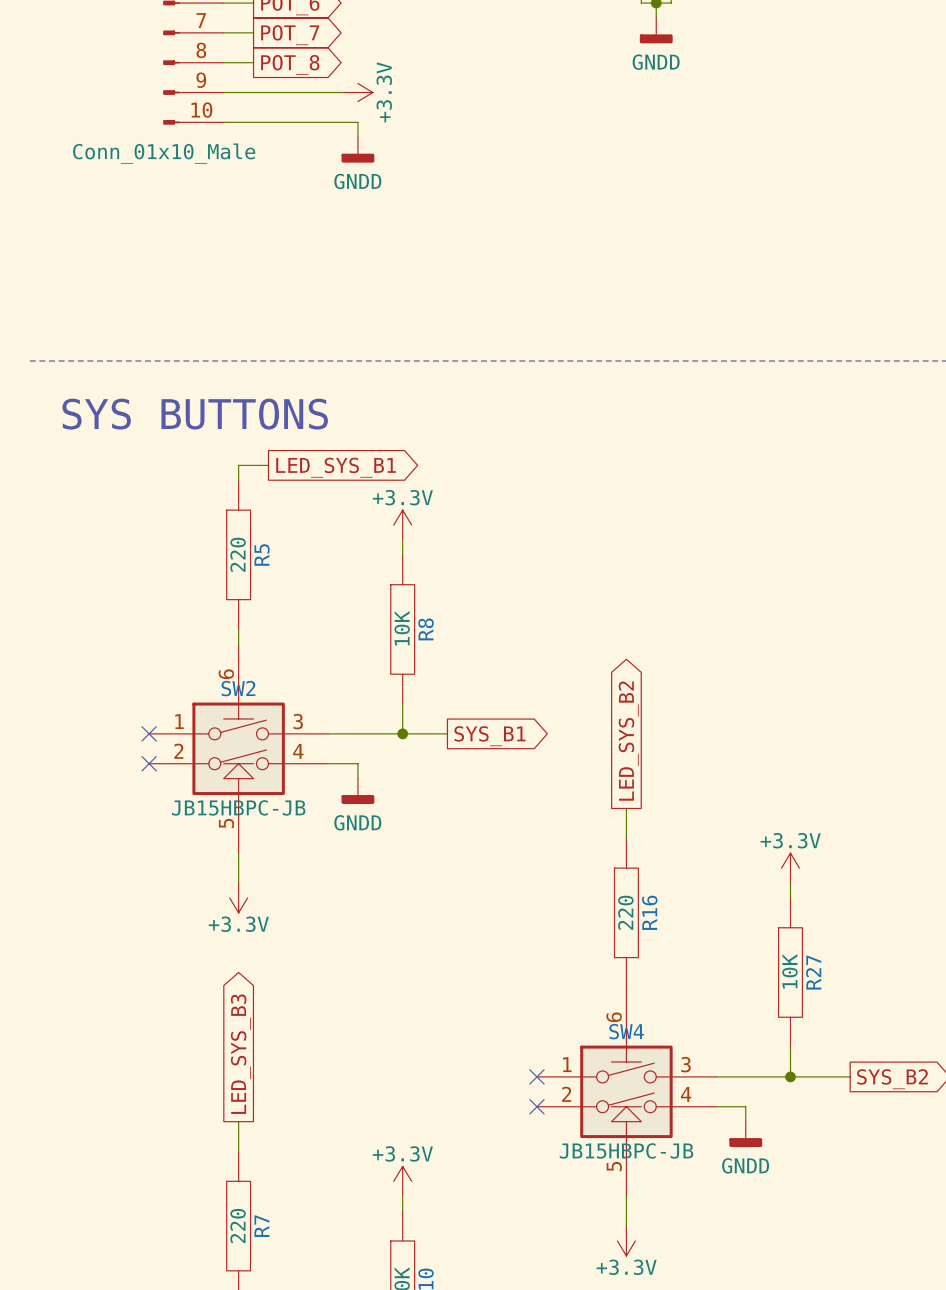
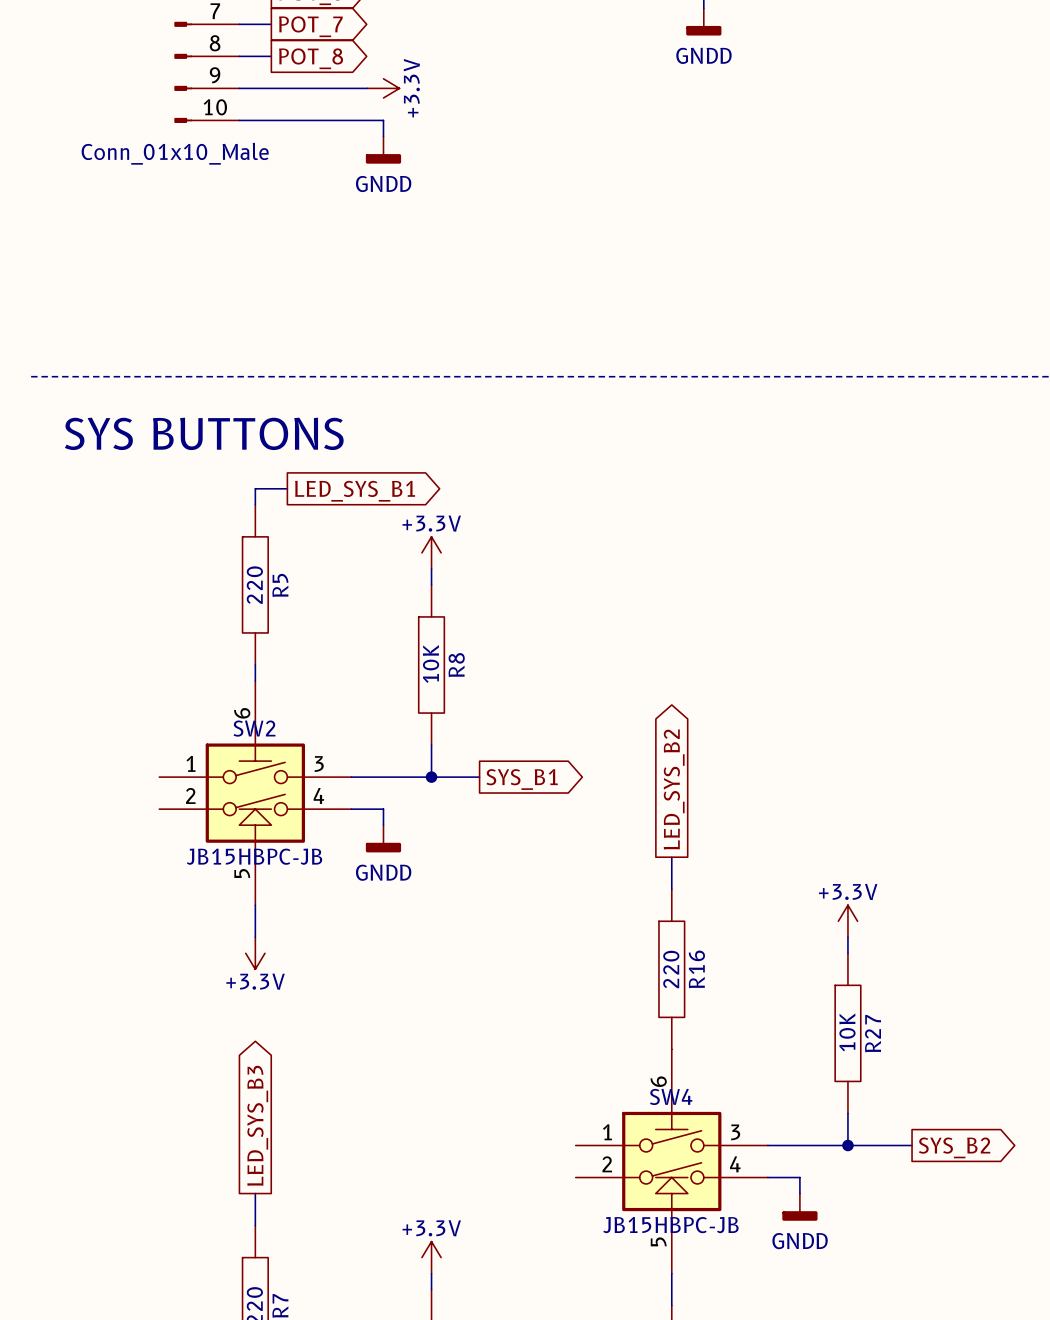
no-connect mark: (149, 733) -> none
no-connect mark: (149, 763) -> none
no-connect mark: (536, 1076) -> none
no-connect mark: (536, 1106) -> none

